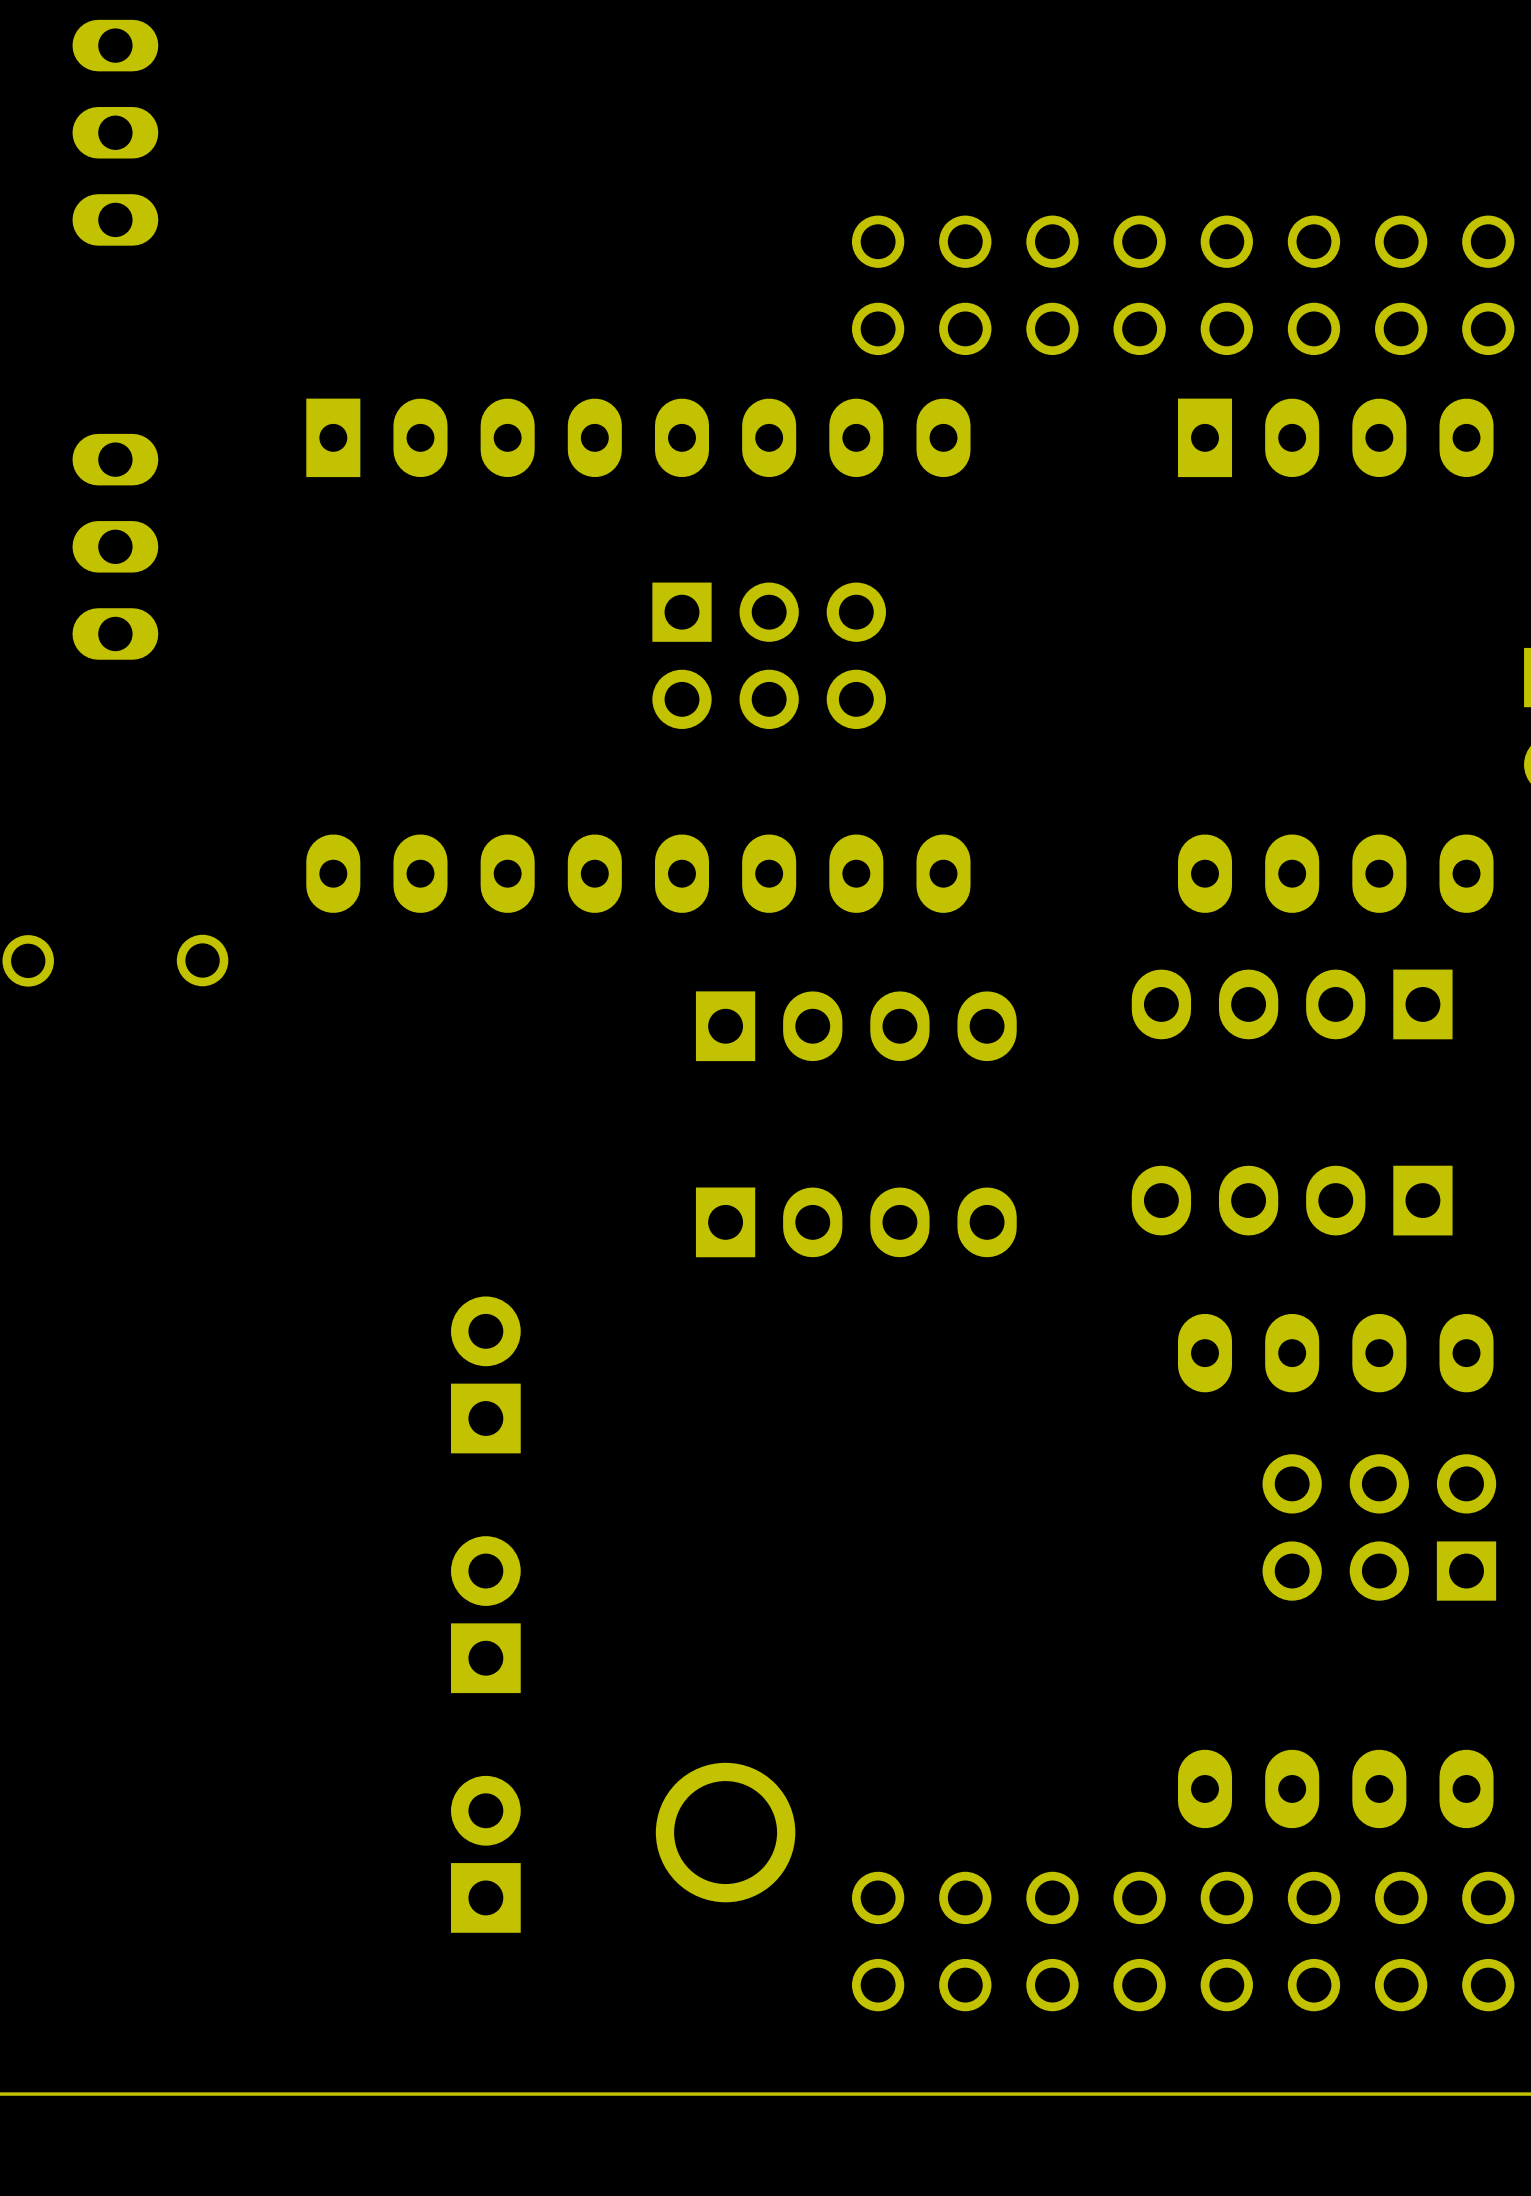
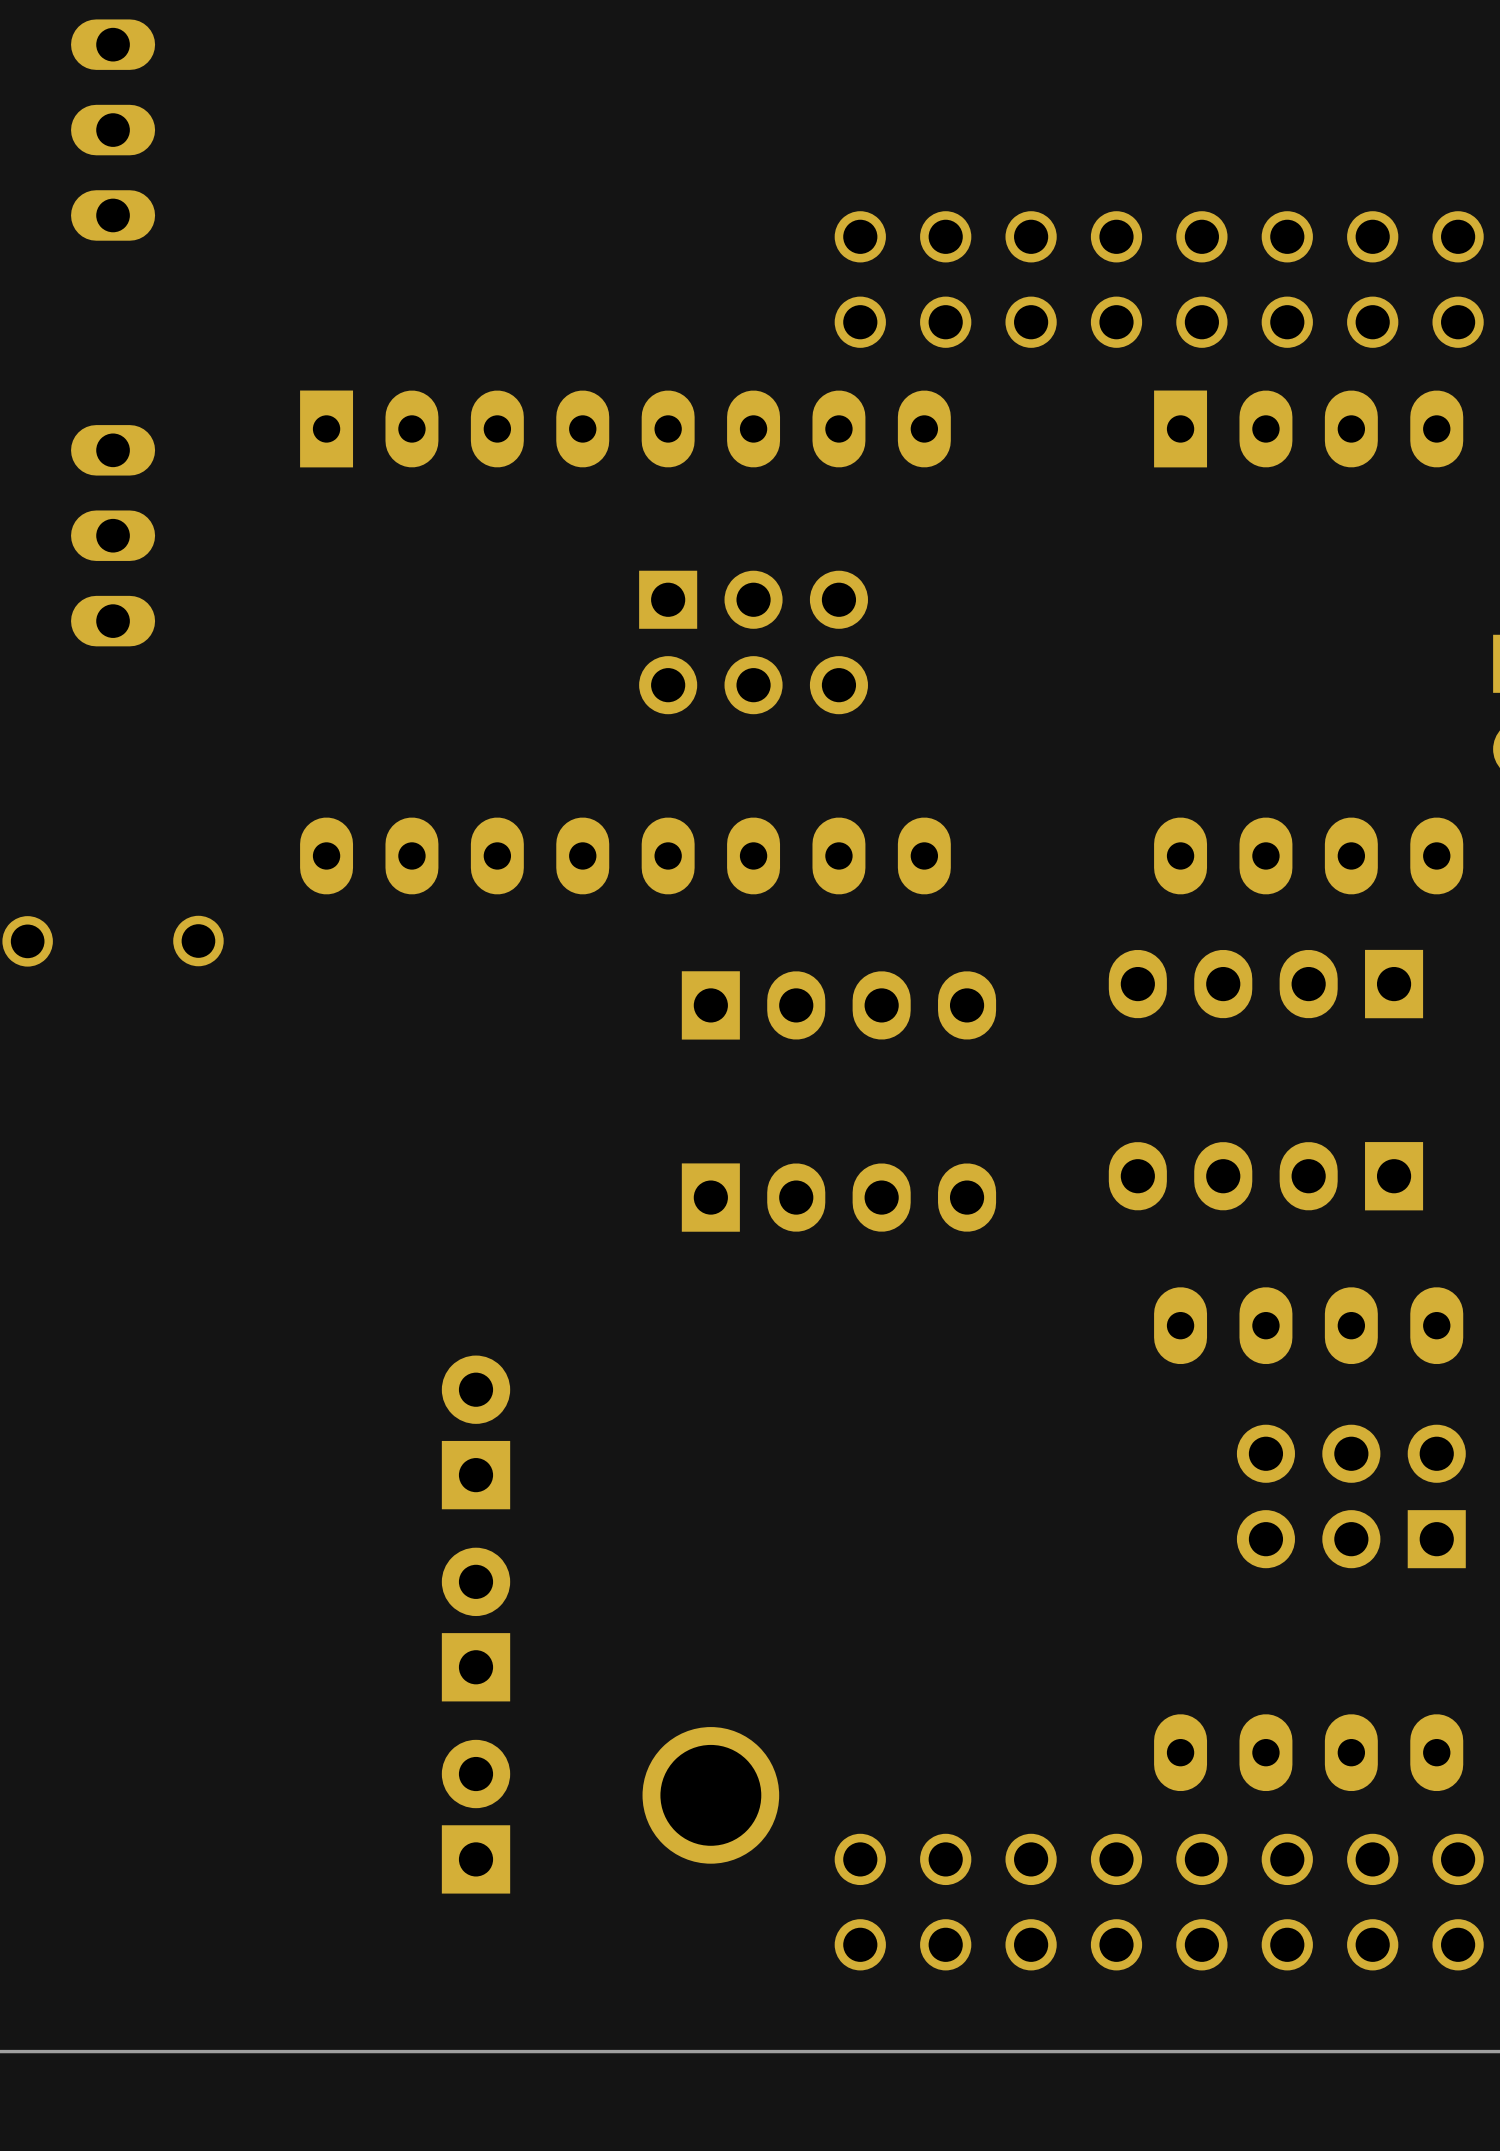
part: (485, 1374) -> none
part: none -> (476, 1432)
part position: (485, 1614) -> (476, 1624)

